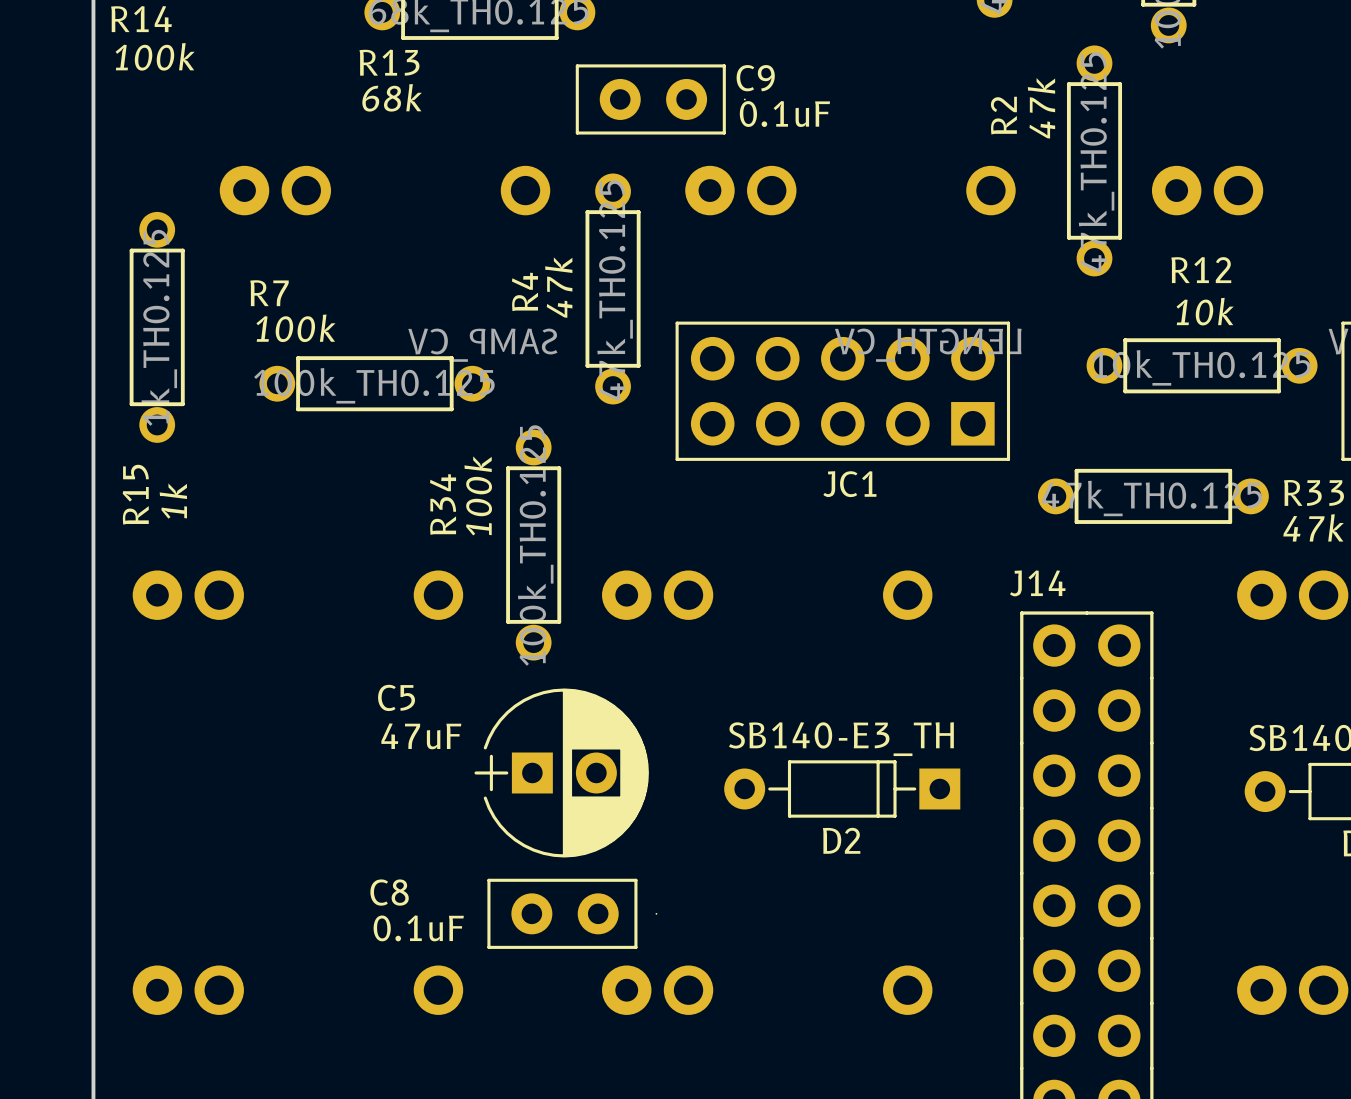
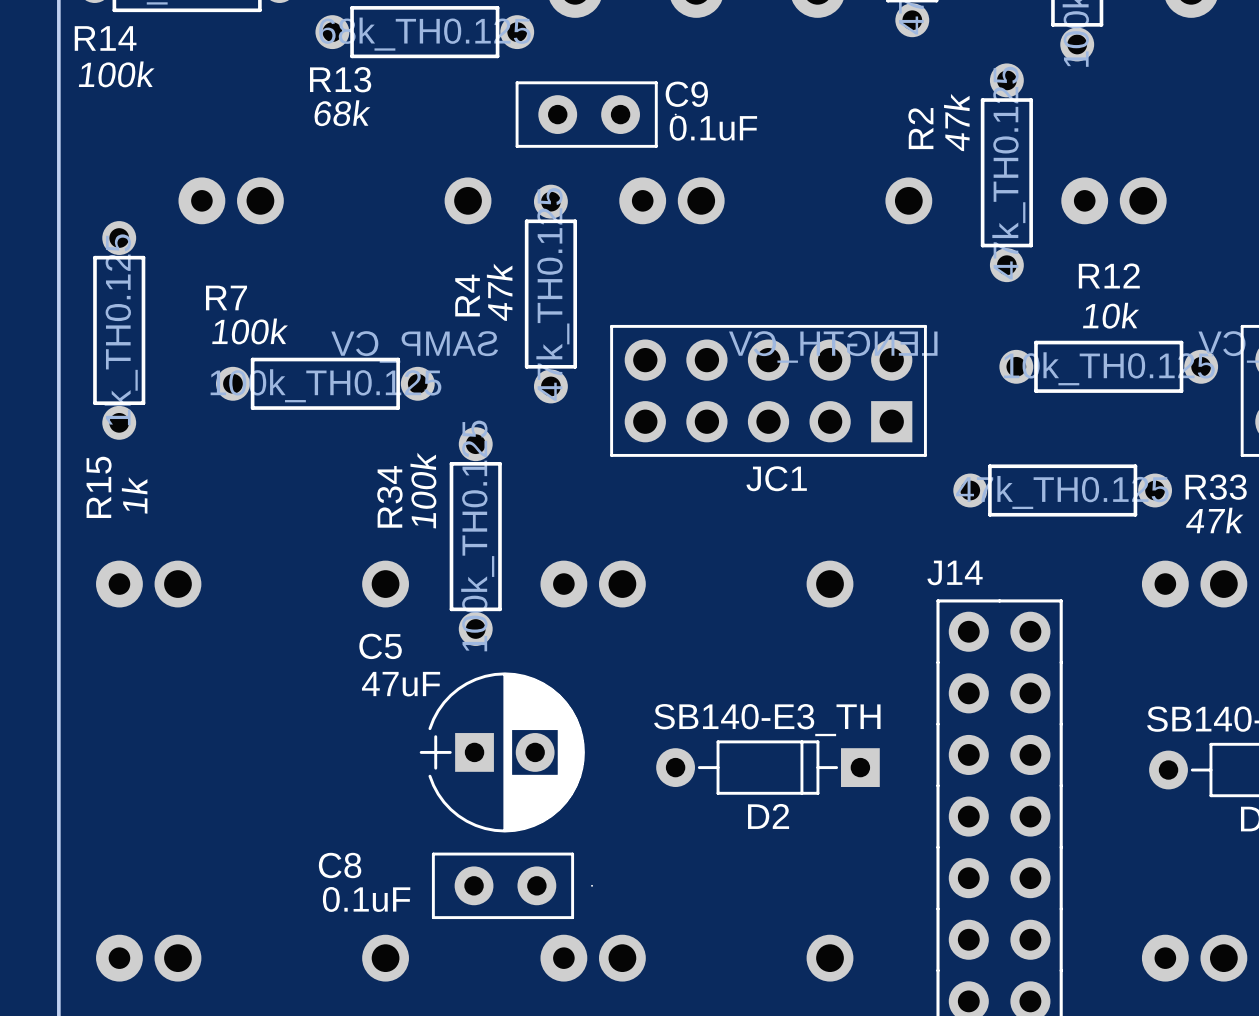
C5 name position: C5 (396, 697) -> C5 (380, 646)
C5 text position: 47uF (421, 736) -> 47uF (401, 684)

